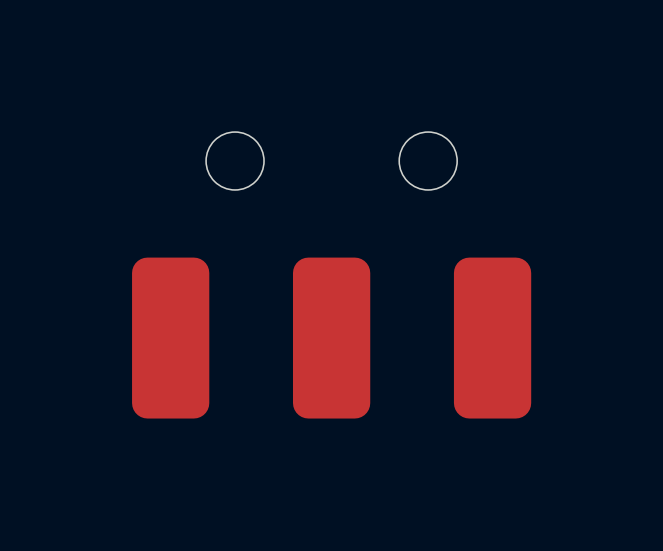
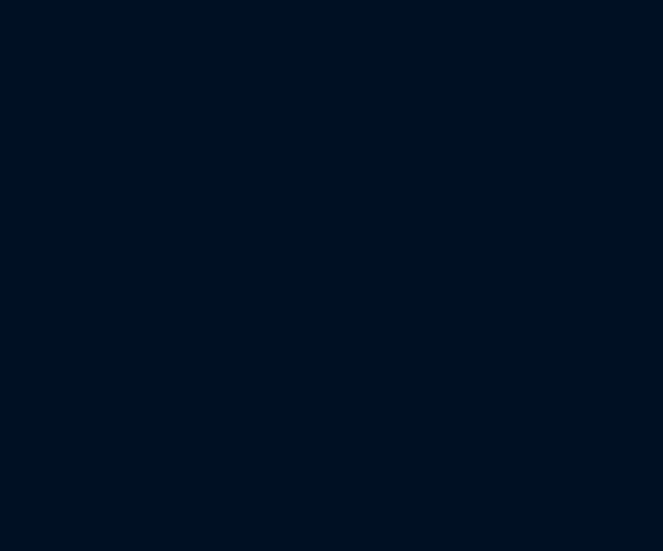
part: (331, 275) -> none

